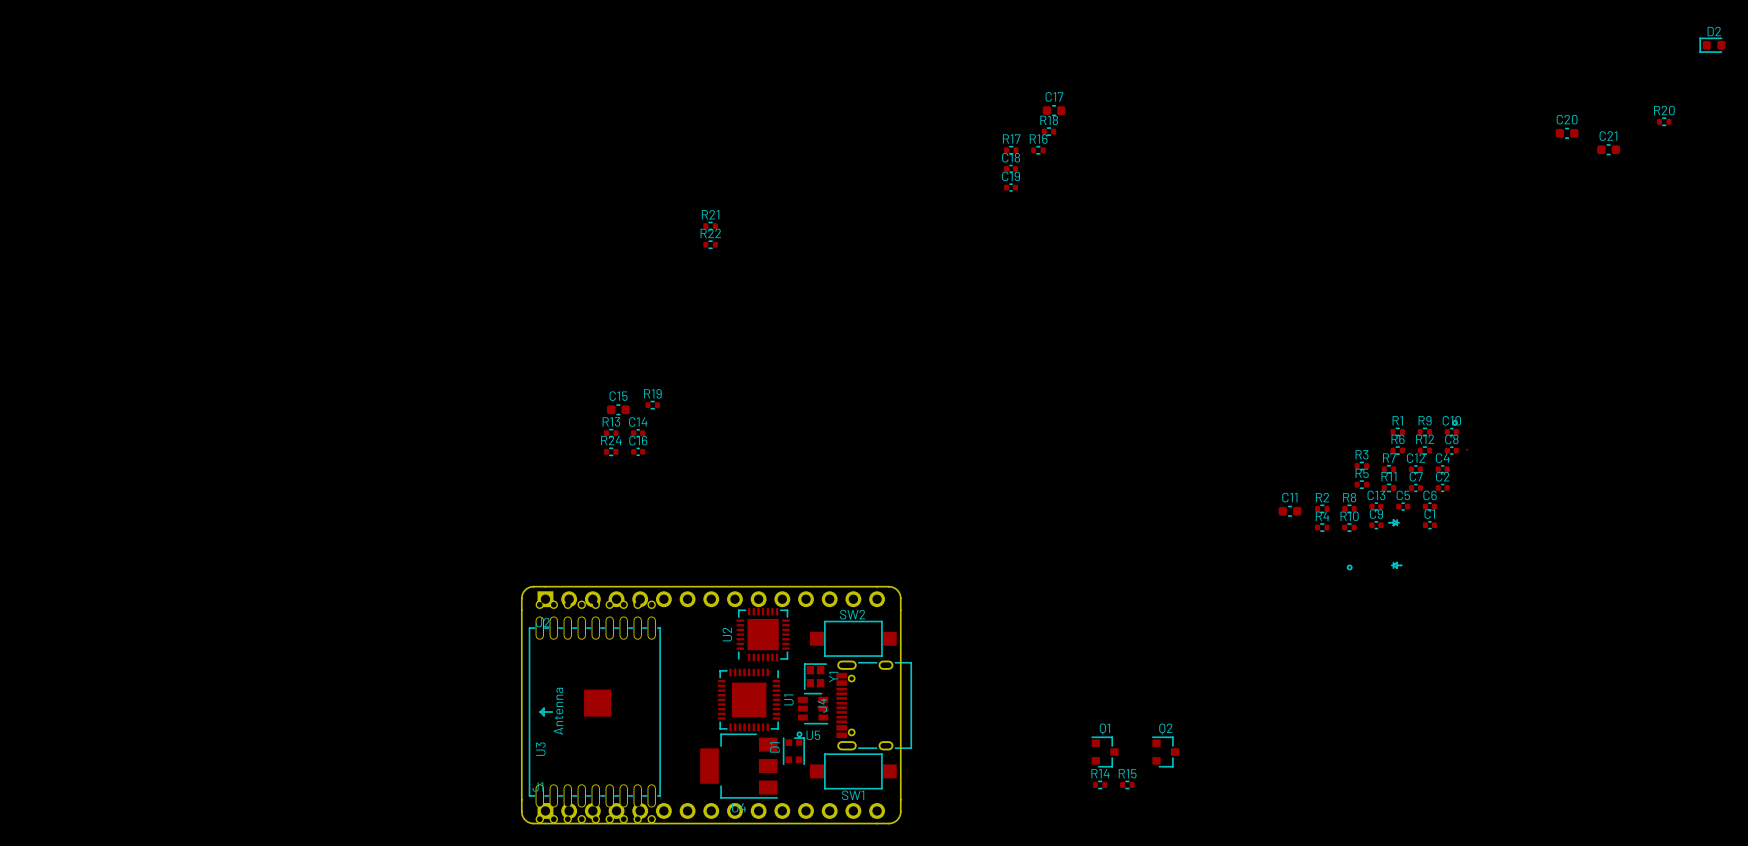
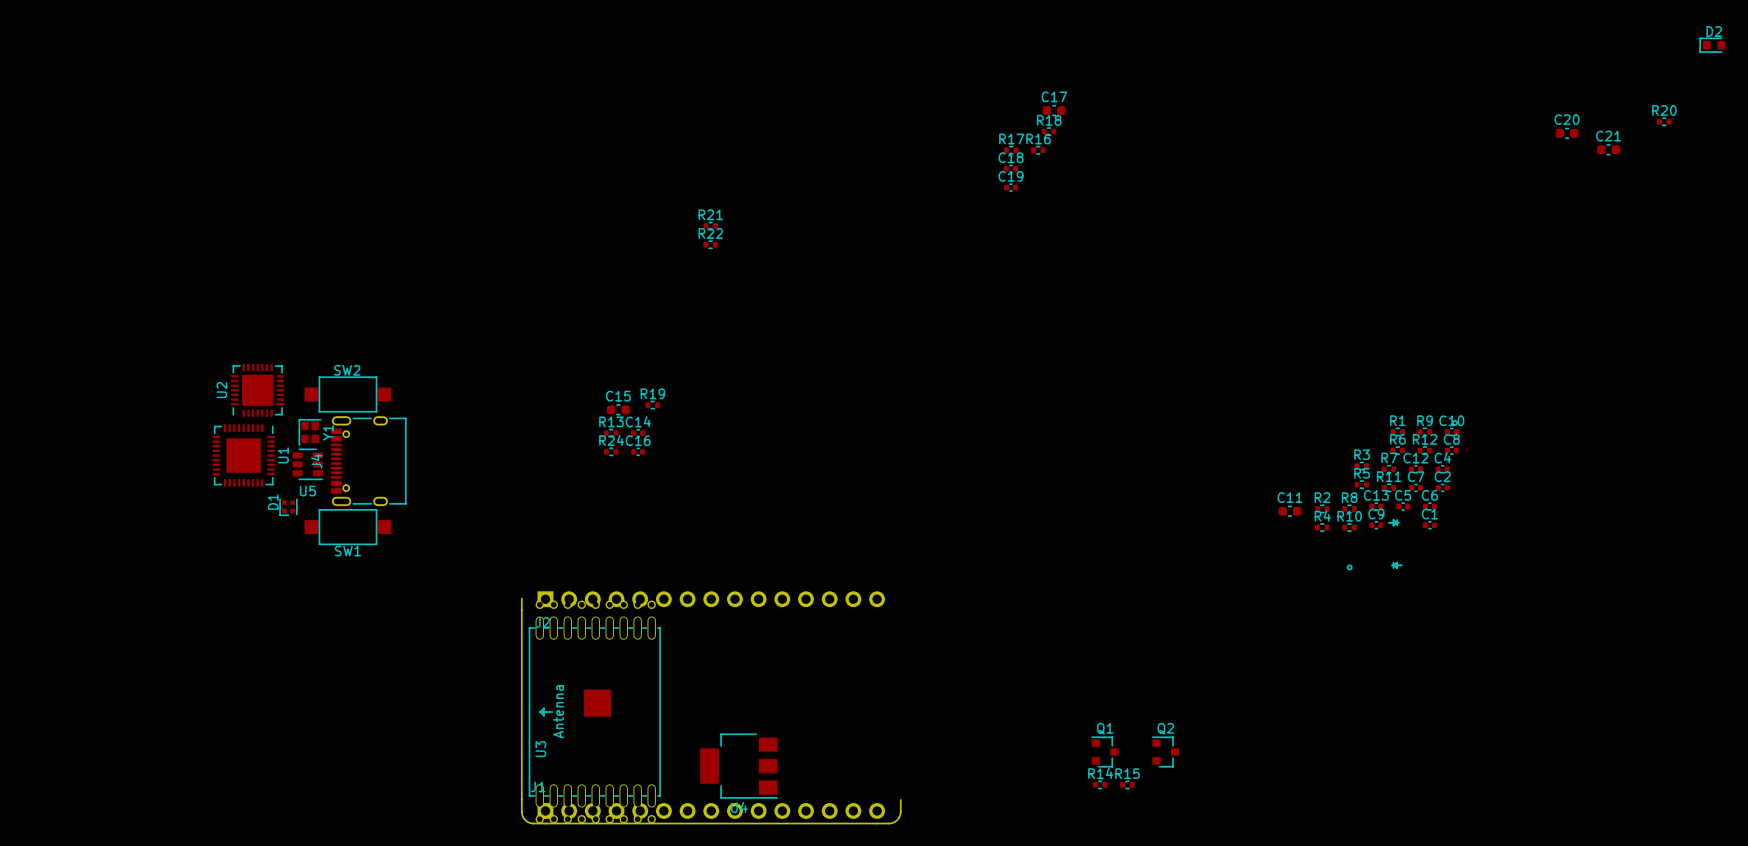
board edge: (521, 598) (525, 590) (533, 586) (888, 586) (894, 588) (899, 592) (900, 598) (900, 799) -> none
U2 position: (763, 634) -> (257, 390)
SW2 position: (853, 638) -> (347, 394)
Y1 position: (815, 676) -> (310, 432)
U1 position: (749, 699) -> (243, 455)
J4 position: (874, 705) -> (368, 461)
U5 position: (813, 708) -> (307, 464)
D1 footprint: [783, 731, 805, 765] -> [279, 498, 298, 516]
SW1 position: (853, 771) -> (347, 527)

